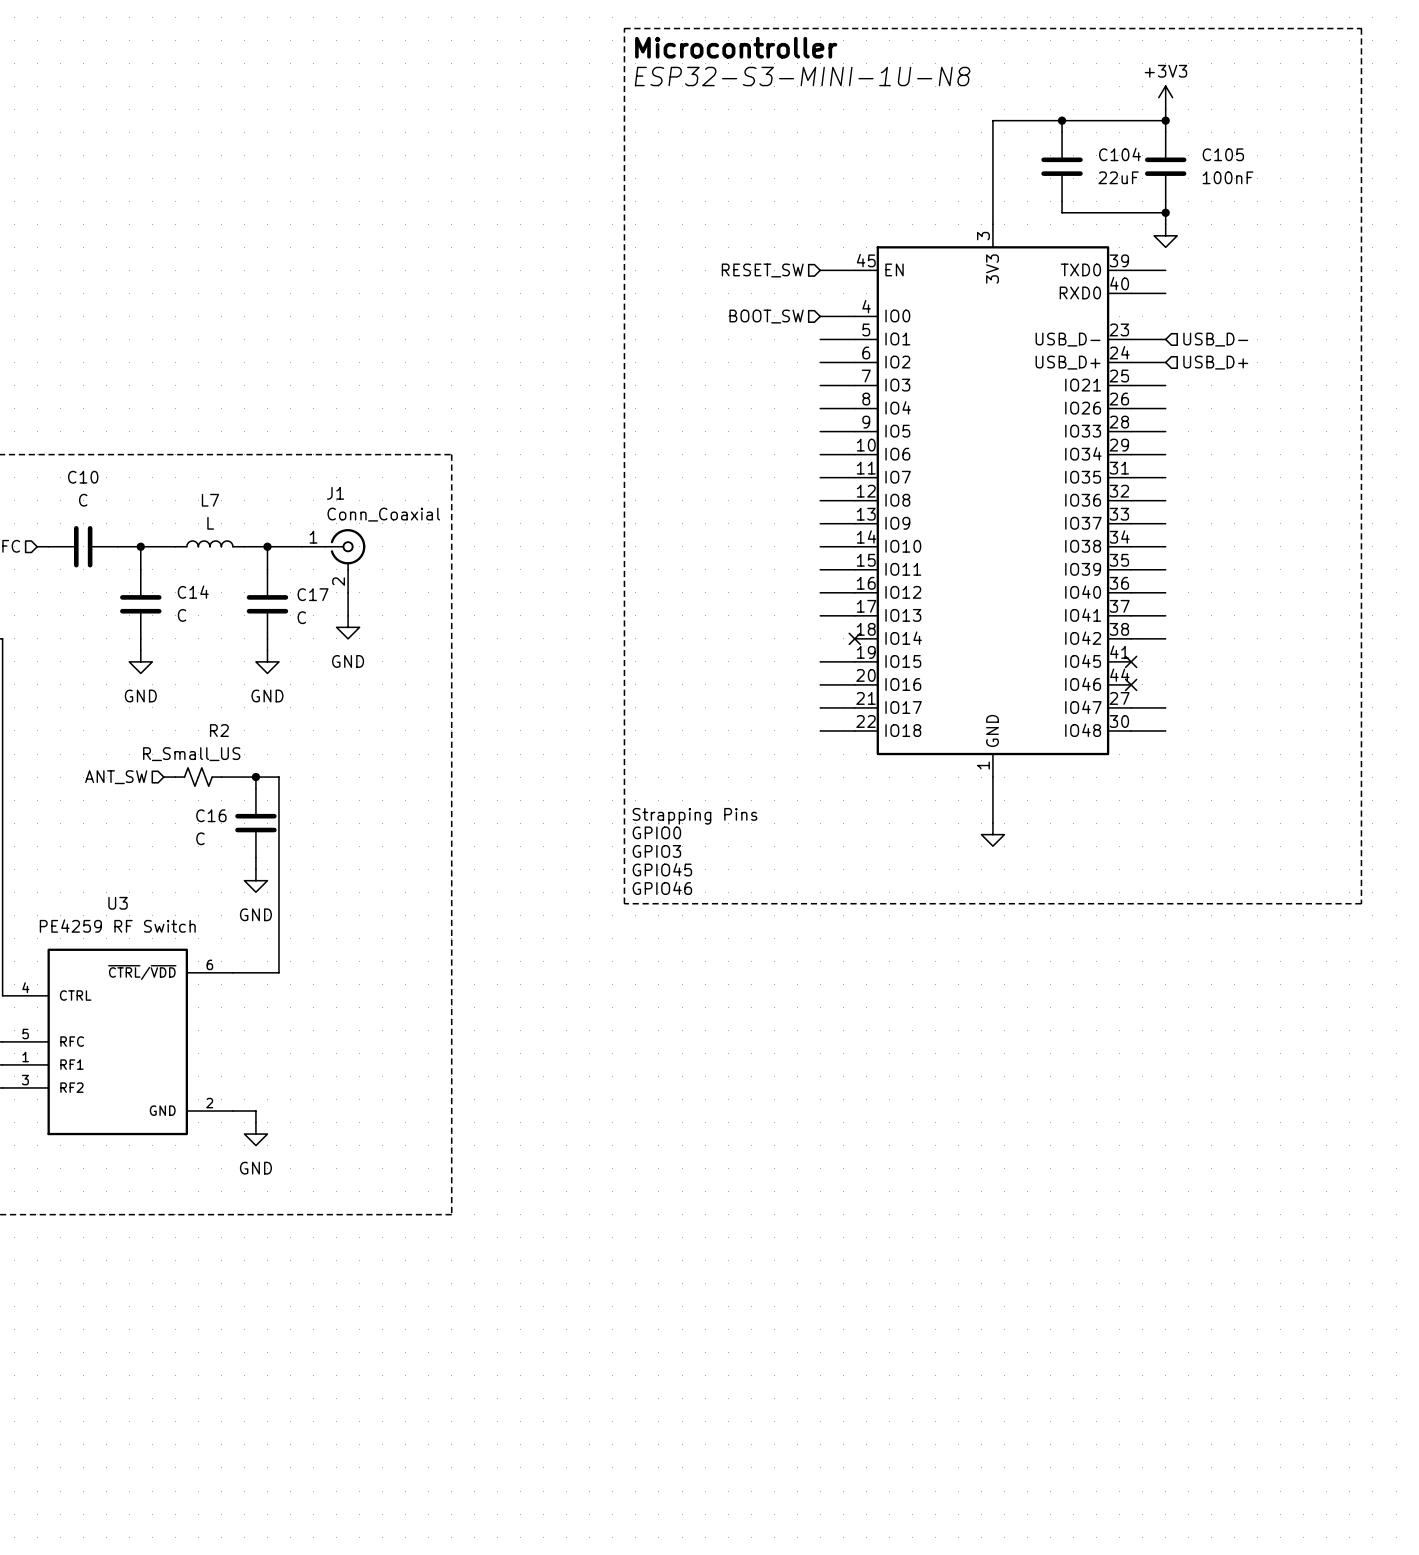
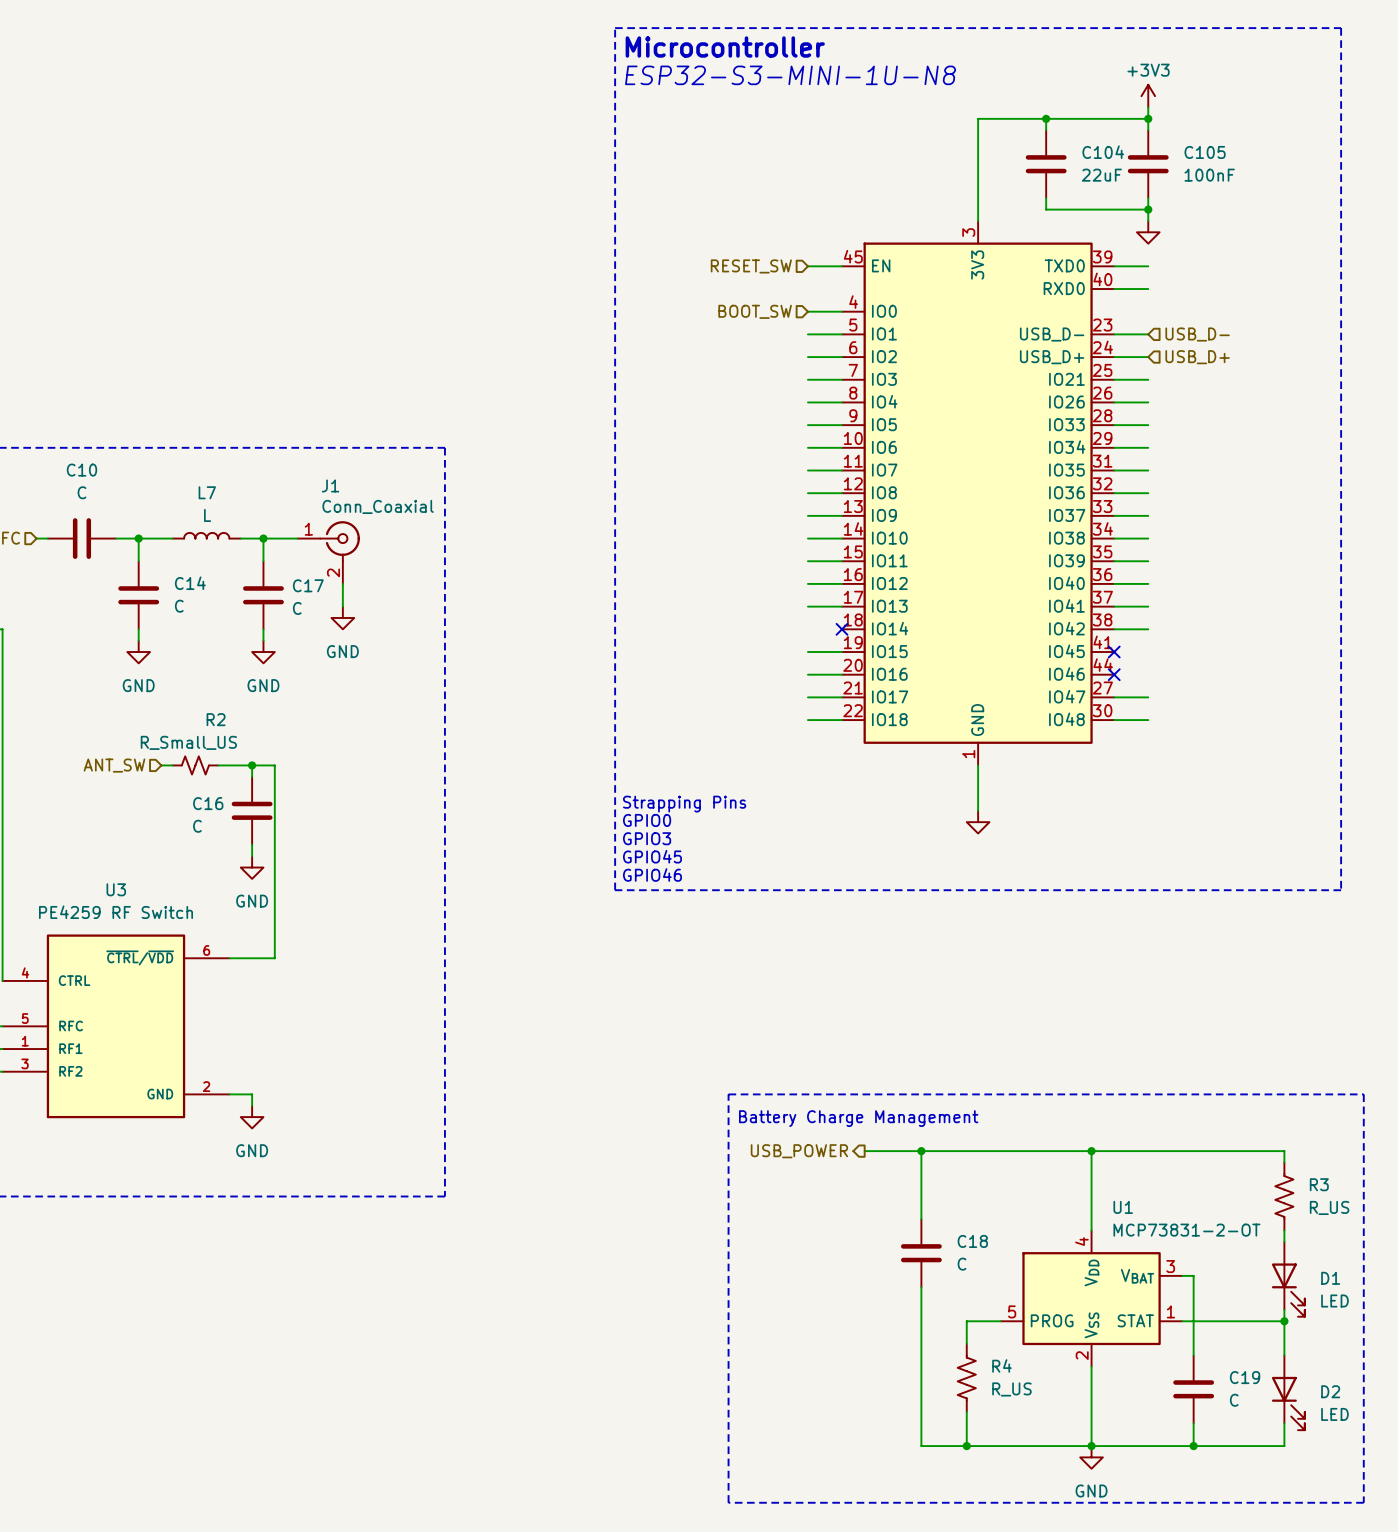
line: none -> (728, 1094) (1363, 1094) (1363, 1502) (728, 1502) (728, 1094)
text: none -> Battery Charge Management (858, 1118)
hierarchical label: none -> USB_POWER (799, 1151)
wire: none -> (864, 1151) (1284, 1151) (1284, 1162)
wire: none -> (921, 1151) (921, 1219)
junction: none -> (921, 1151)
wire: none -> (1091, 1151) (1091, 1230)
junction: none -> (1091, 1151)
R3: none -> R_US (1284, 1196)
wire: none -> (1284, 1230) (1284, 1241)
C18: none -> C (921, 1253)
wire: none -> (1182, 1275) (1193, 1275) (1193, 1355)
D1: none -> LED (1288, 1279)
wire: none -> (921, 1287) (921, 1446) (1284, 1446) (1284, 1423)
U1: none -> MCP73831-2-OT (1091, 1298)
wire: none -> (1284, 1309) (1284, 1355)
wire: none -> (1000, 1321) (966, 1321) (966, 1343)
wire: none -> (1182, 1321) (1284, 1321)
junction: none -> (1284, 1321)
wire: none -> (1091, 1366) (1091, 1446)
R4: none -> R_US (966, 1377)
C19: none -> C (1193, 1389)
D2: none -> LED (1288, 1392)
wire: none -> (966, 1412) (966, 1446)
wire: none -> (1193, 1423) (1193, 1446)
junction: none -> (966, 1446)
junction: none -> (1091, 1446)
junction: none -> (1193, 1446)
power symbol: none -> GND (1091, 1457)

